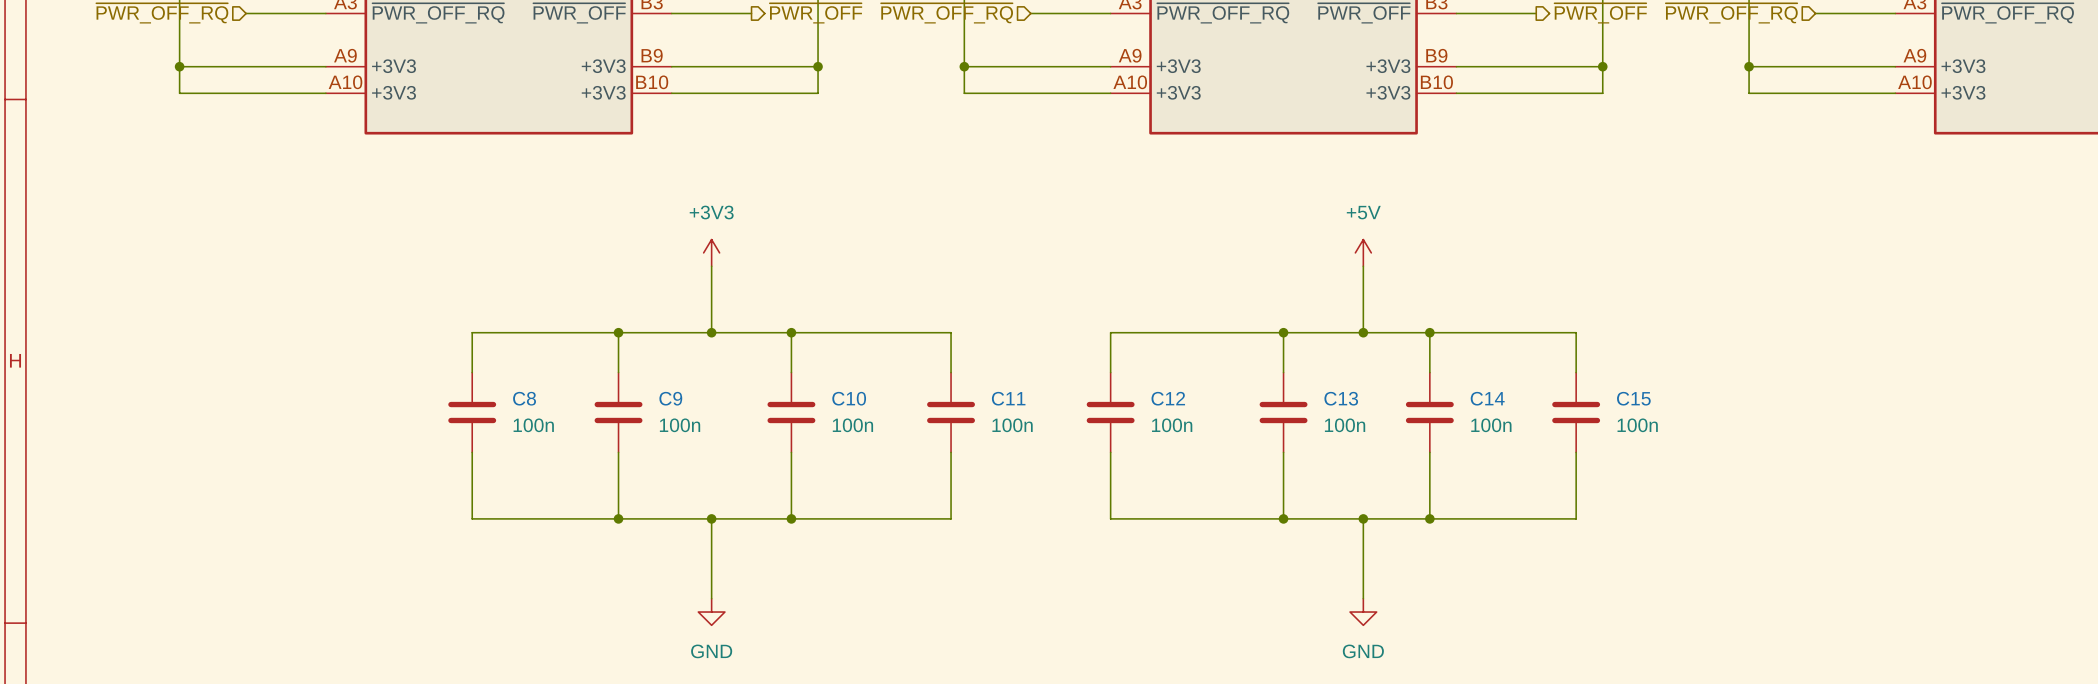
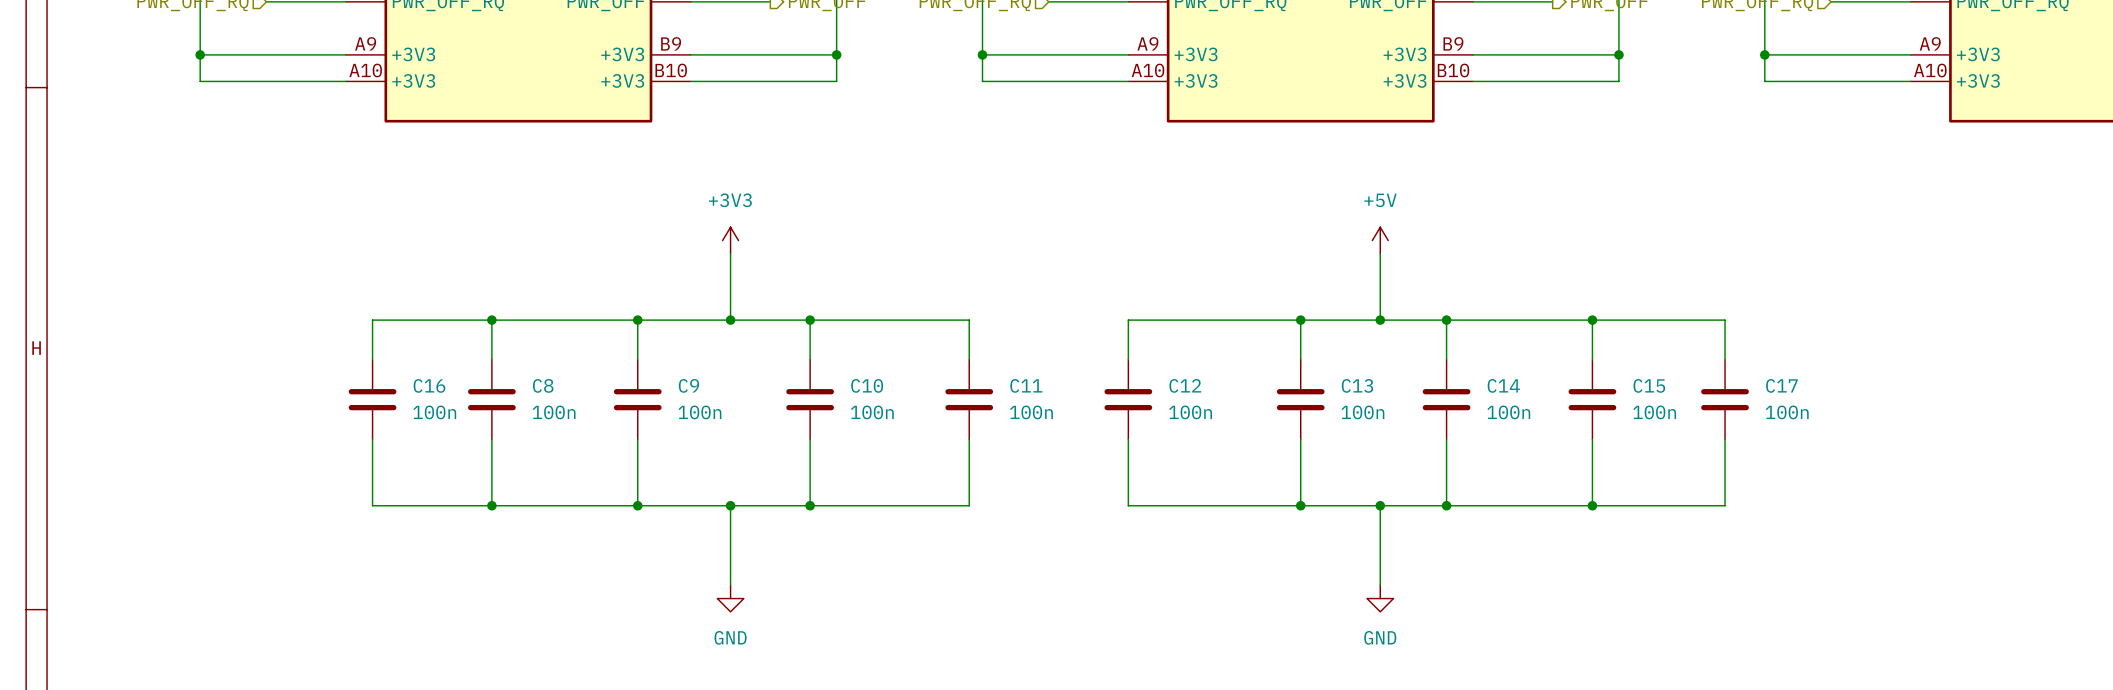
wire: none -> (491, 320) (372, 320) (372, 359)
junction: none -> (491, 320)
wire: none -> (1592, 320) (1725, 320) (1725, 359)
junction: none -> (1592, 320)
C16: none -> 100n (372, 399)
C17: none -> 100n (1725, 399)
wire: none -> (372, 439) (372, 505) (491, 505)
wire: none -> (1725, 439) (1725, 505) (1592, 505)
junction: none -> (491, 505)
junction: none -> (1592, 505)

